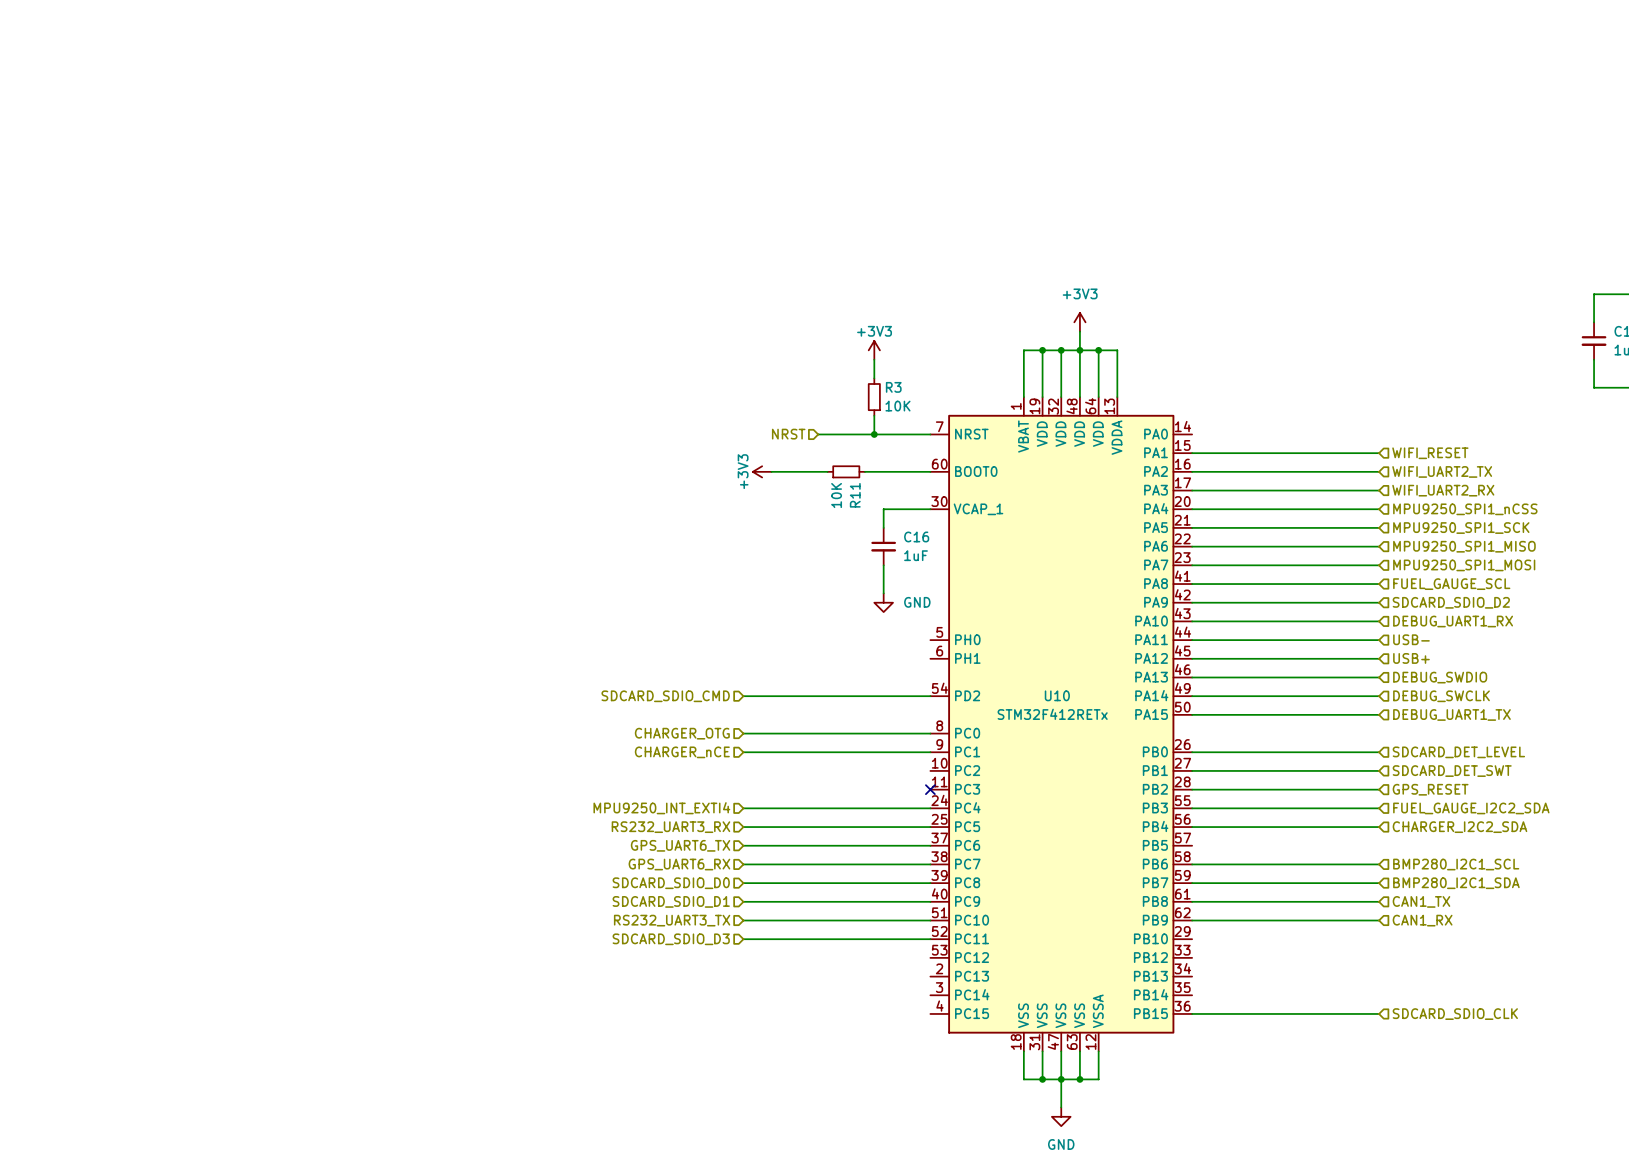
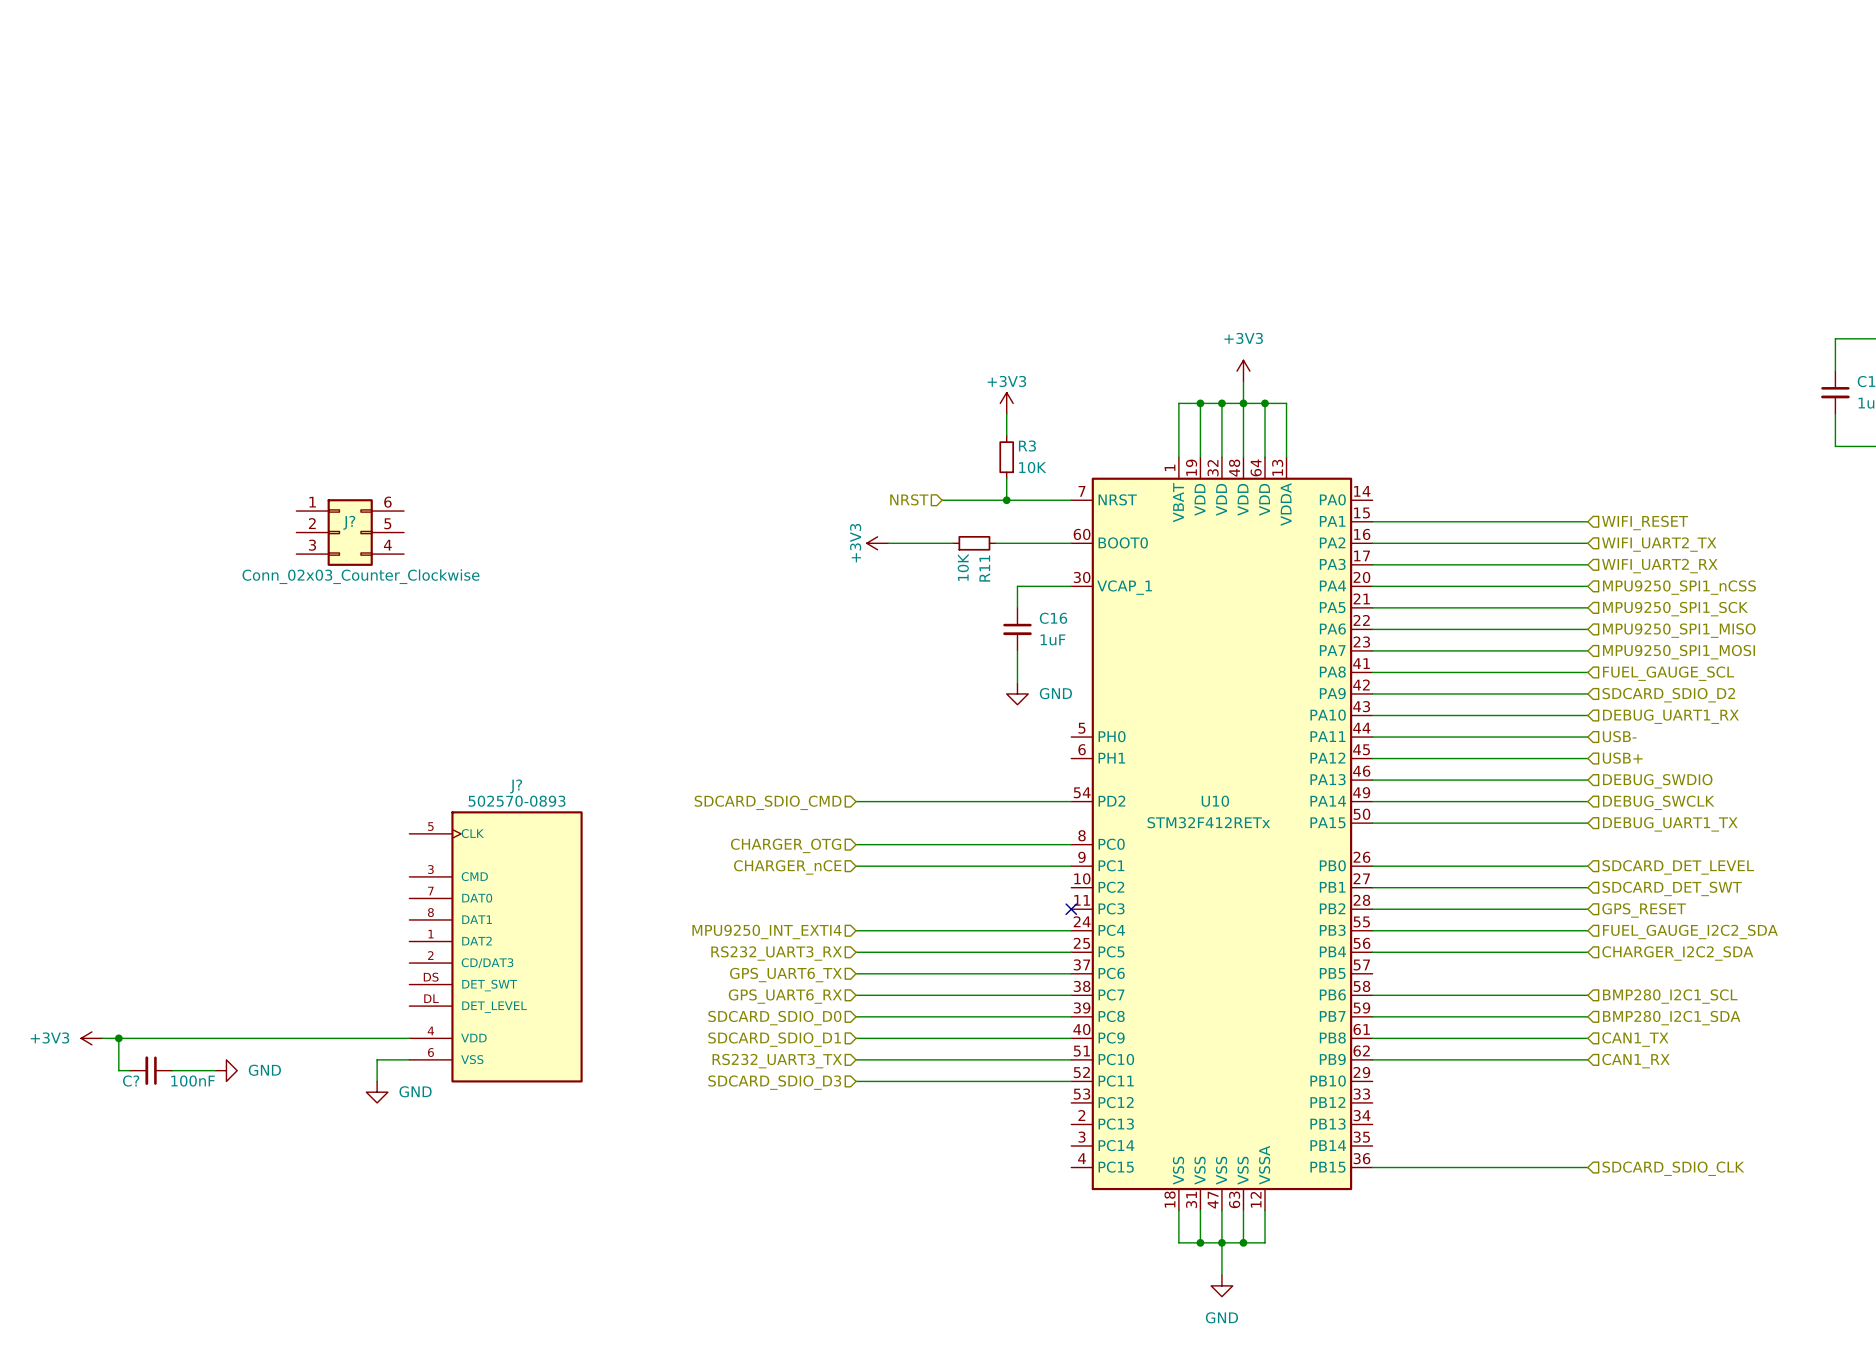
J?: none -> Conn_02x03_Counter_Clockwise (350, 532)
J?: none -> 502570-0893 (496, 946)
power symbol: none -> +3V3 (91, 1038)
wire: none -> (102, 1038) (409, 1038)
wire: none -> (118, 1038) (118, 1070) (129, 1070)
junction: none -> (118, 1038)
wire: none -> (409, 1059) (377, 1059) (377, 1081)
C?: none -> 100nF (151, 1070)
wire: none -> (172, 1070) (215, 1070)
power symbol: none -> GND (226, 1070)
power symbol: none -> GND (377, 1092)

